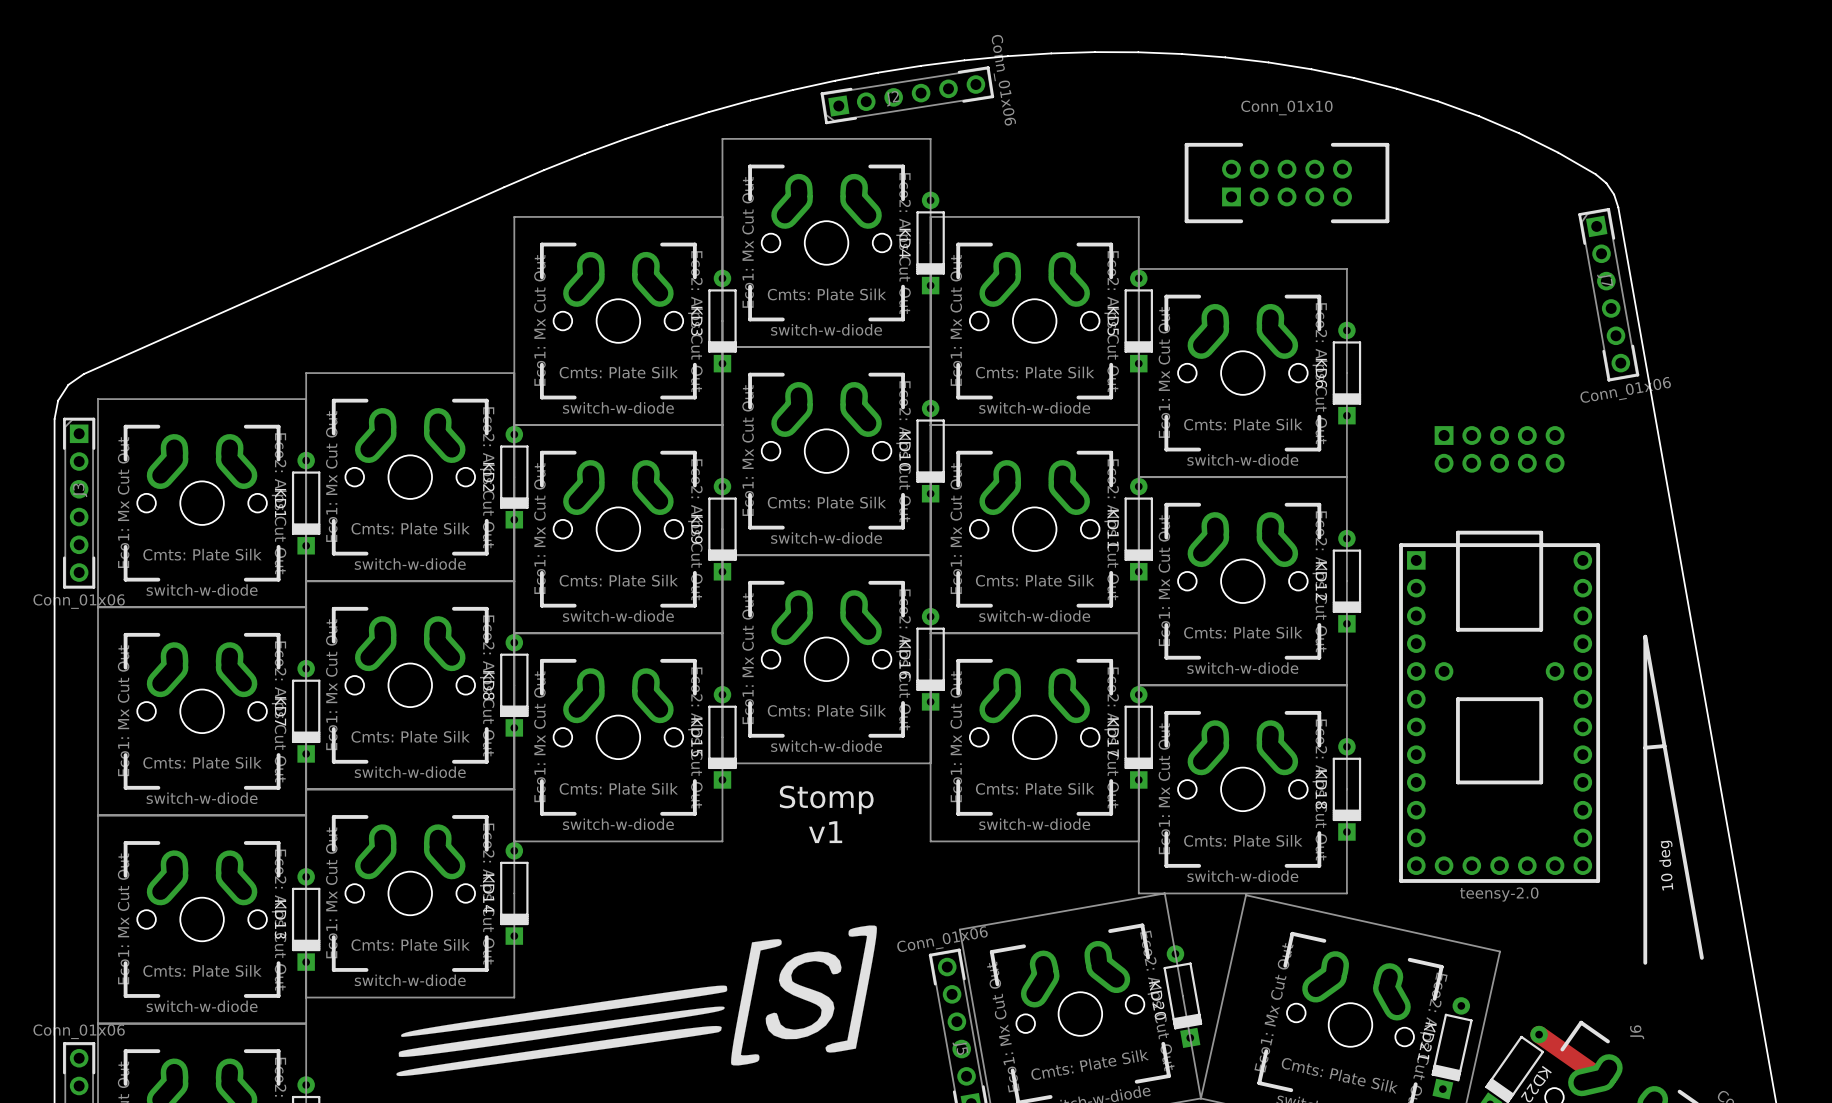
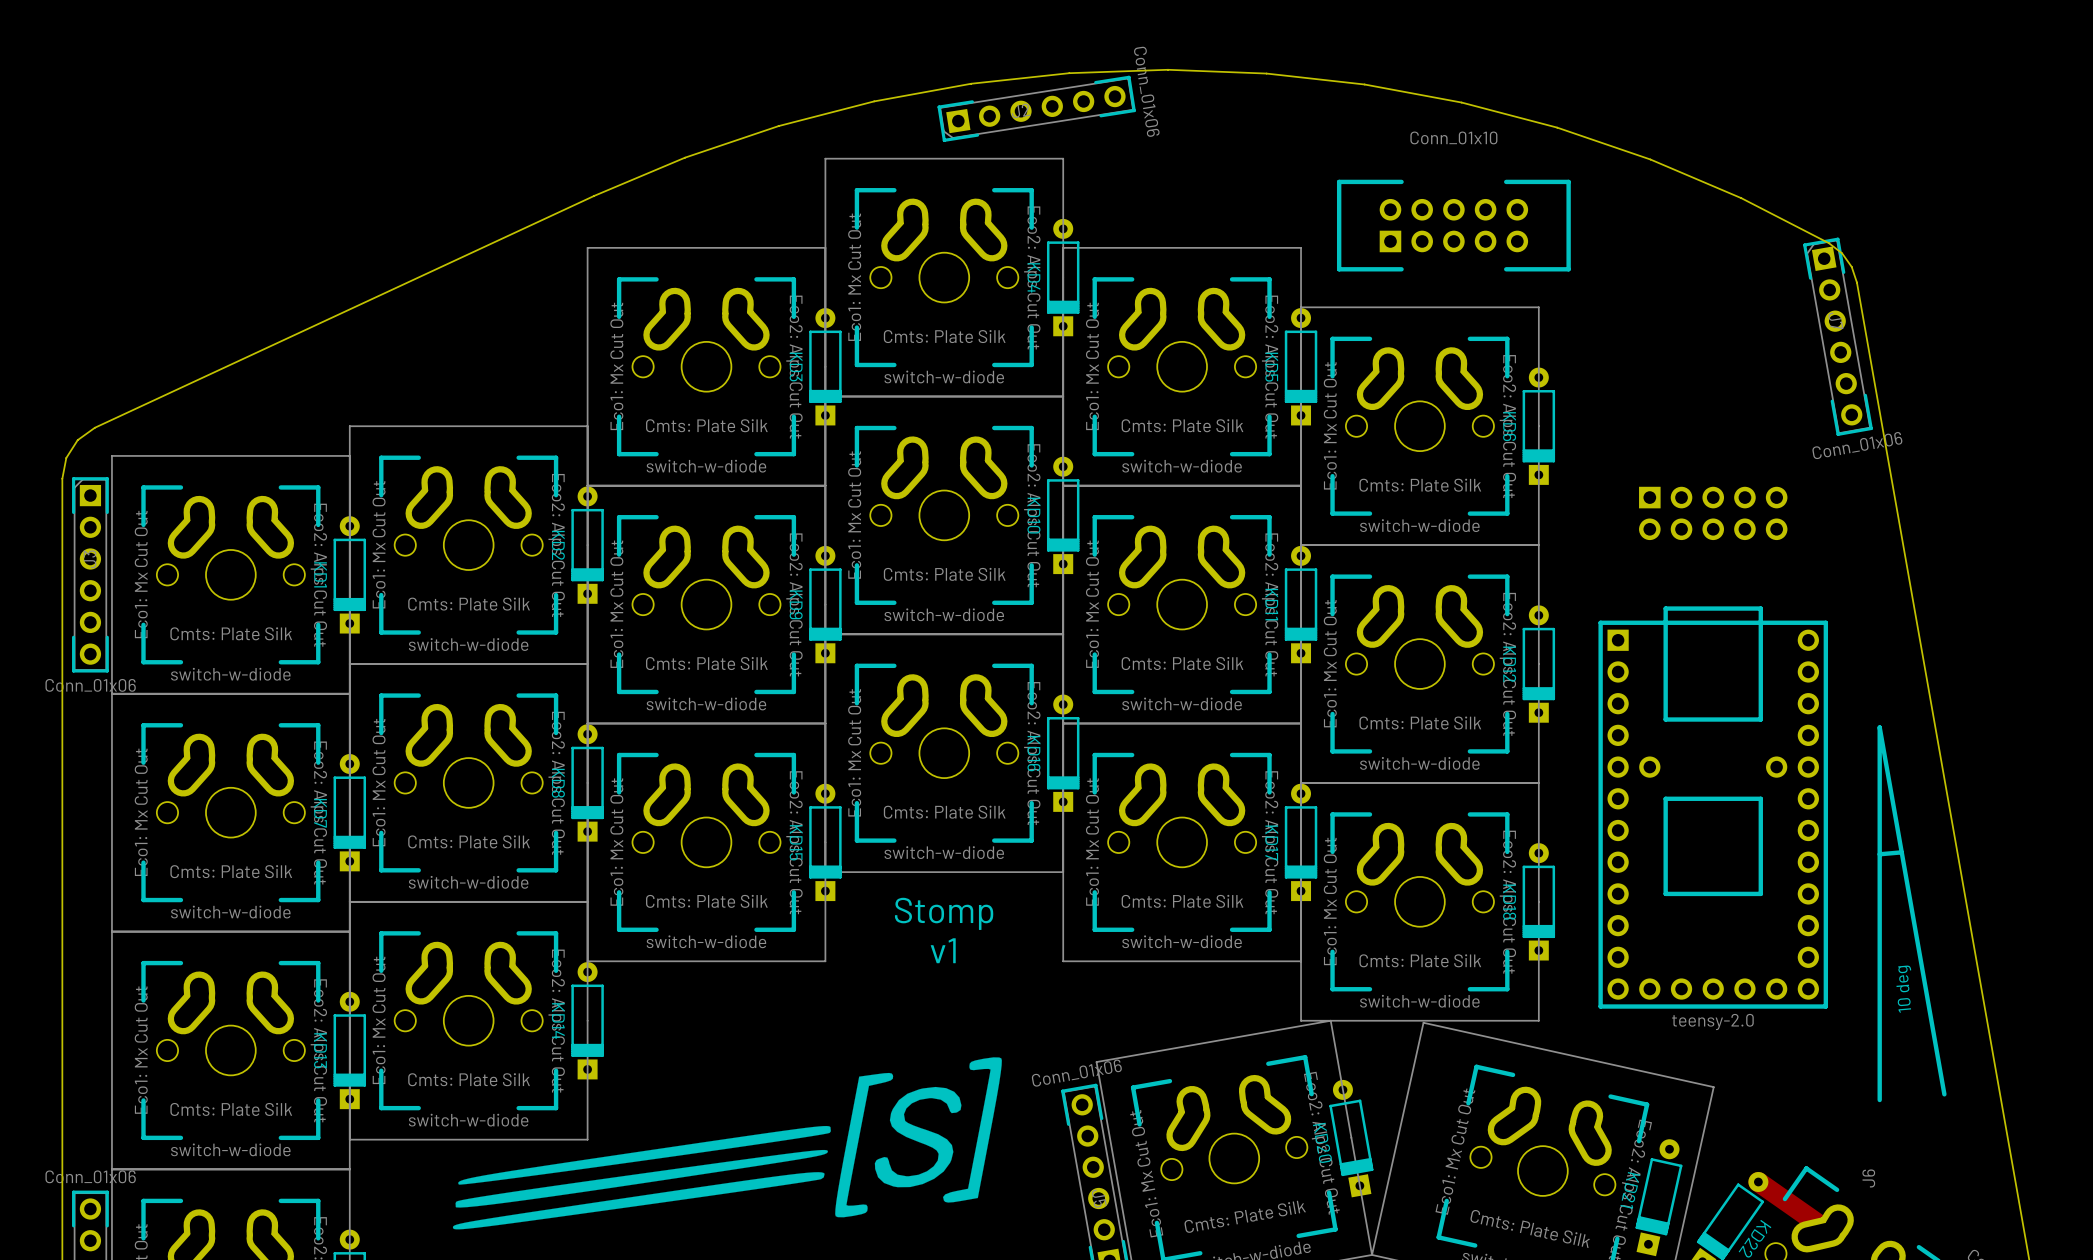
part position: (1287, 183) -> (1453, 225)
board edge: (1625, 247) (1614, 194) (1606, 183) (1595, 174) (1519, 133) (1479, 116) (1396, 88) (1311, 69) (1268, 62) (1181, 54) (1094, 52) (964, 60) (878, 72) (792, 90) (708, 112) (584, 153) (504, 187) (83, 374) (68, 384) (58, 400) (54, 419) -> (1856, 282) (1851, 266) (1842, 253) (1829, 243) (1741, 198) (1650, 159) (1557, 127) (1461, 102) (1364, 84) (1266, 73) (1167, 69) (1069, 73) (971, 83) (874, 101) (778, 126) (685, 157) (594, 195) (94, 427) (77, 440) (66, 457) (62, 478)

